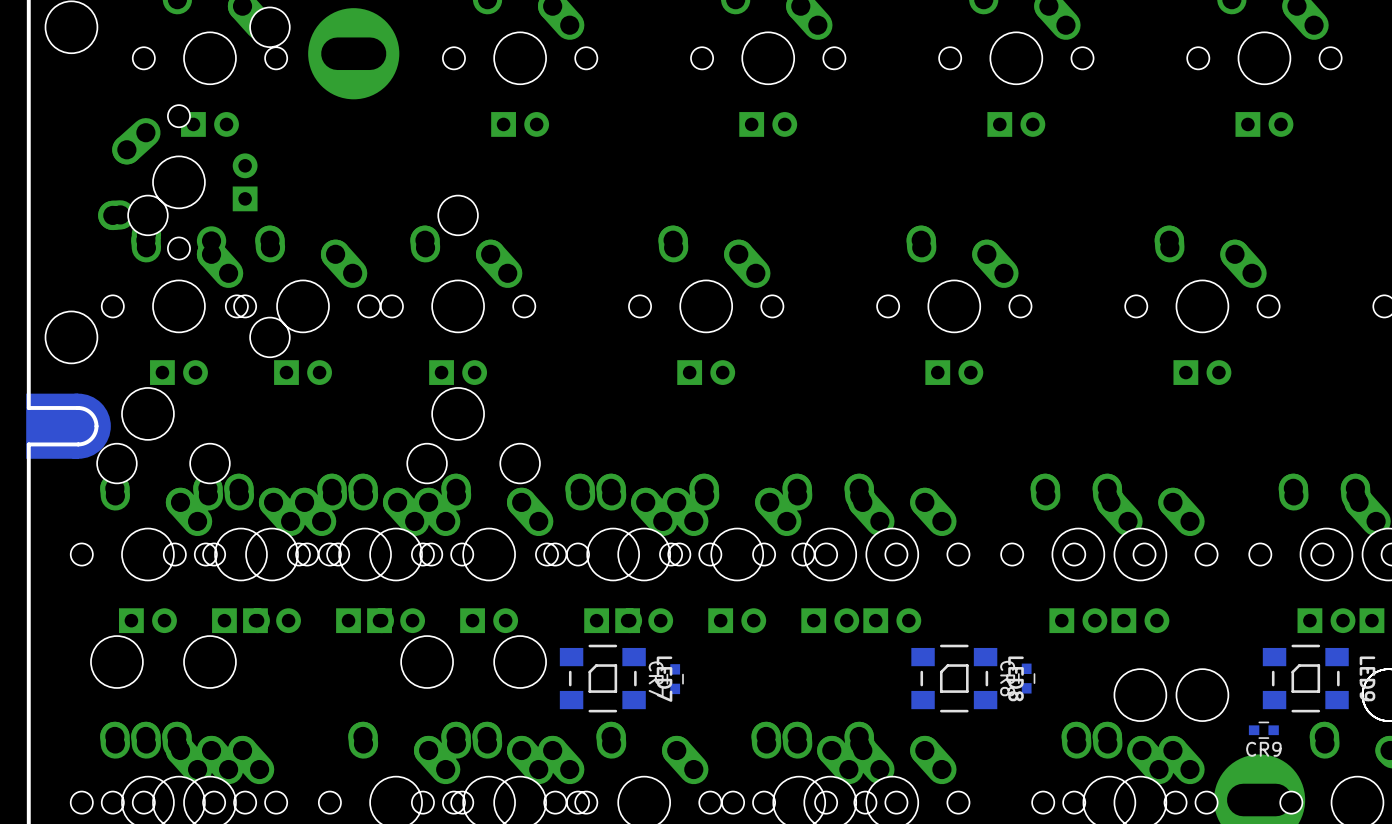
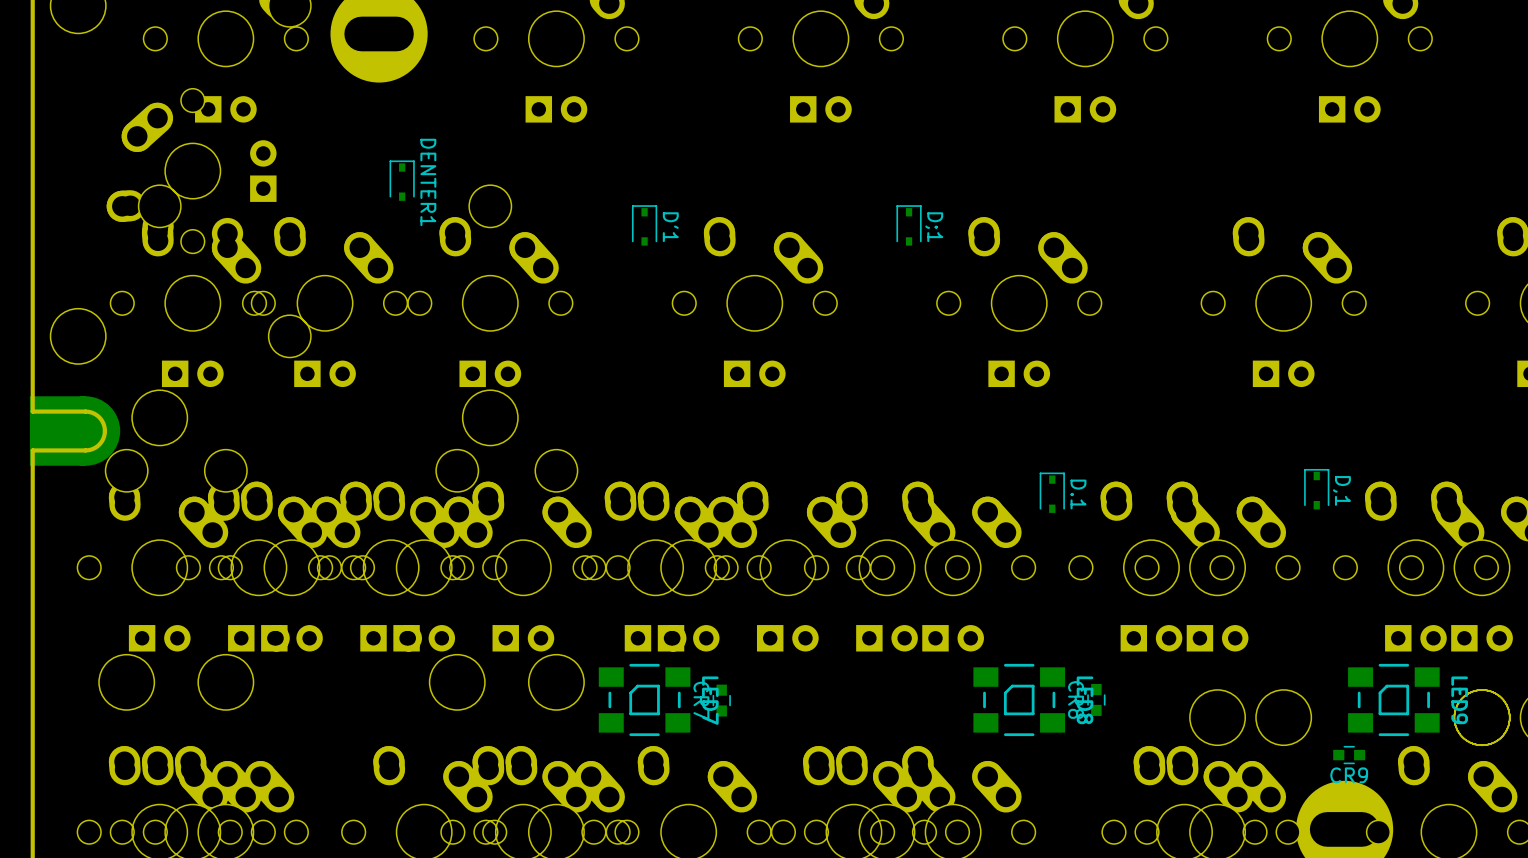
DENTER1: none -> (402, 180)
D'1: none -> (644, 225)
D;1: none -> (909, 225)
D,1: none -> (1316, 489)
D.1: none -> (1052, 492)

